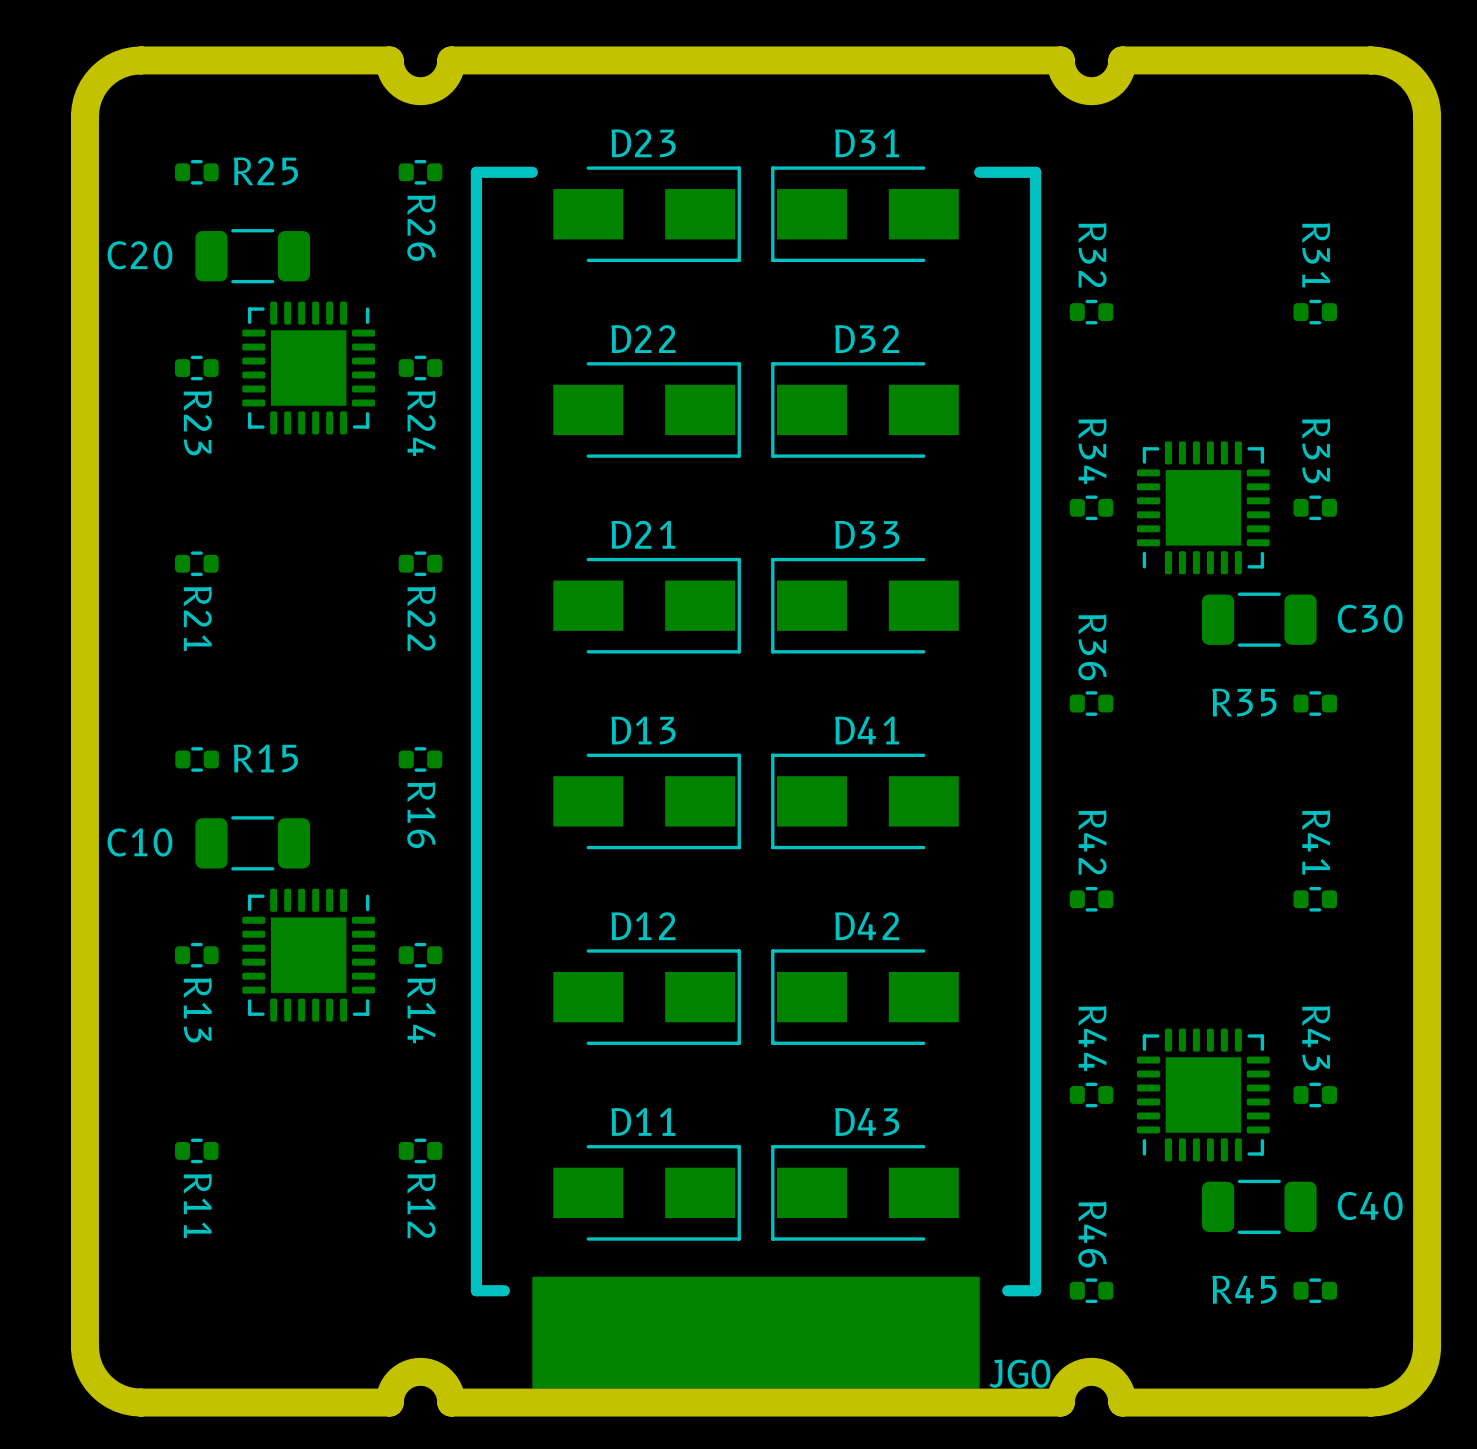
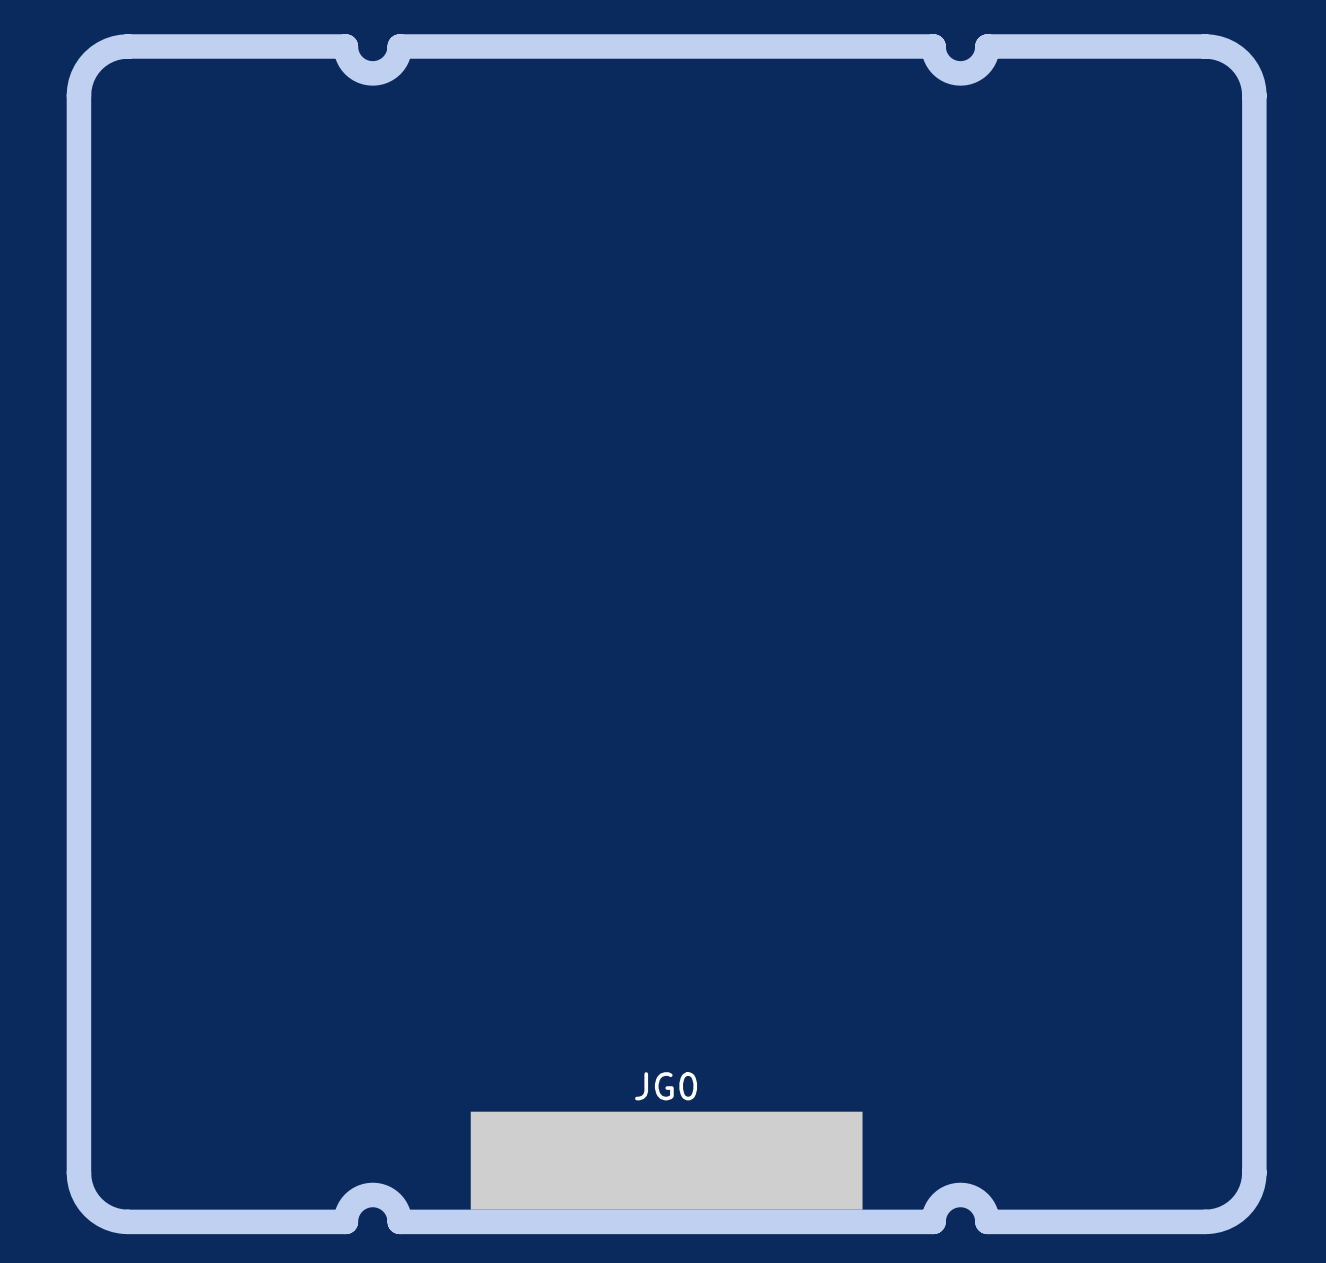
R25: (196, 172) -> none
R26: (420, 172) -> none
line: (532, 172) (476, 172) (476, 1290) (504, 1290) -> none
line: (979, 172) (1035, 172) (1035, 1290) (1007, 1290) -> none
D23: (647, 214) -> none
D31: (864, 214) -> none
C20: (252, 256) -> none
R32: (1091, 312) -> none
R31: (1315, 312) -> none
R23: (196, 368) -> none
part: (308, 368) -> none
R24: (420, 368) -> none
D22: (647, 409) -> none
D32: (864, 409) -> none
R34: (1091, 507) -> none
part: (1203, 507) -> none
R33: (1315, 507) -> none
R21: (196, 563) -> none
R22: (420, 563) -> none
D21: (647, 605) -> none
D33: (864, 605) -> none
C30: (1259, 619) -> none
R36: (1091, 703) -> none
R35: (1315, 703) -> none
R15: (197, 759) -> none
R16: (420, 759) -> none
D13: (647, 801) -> none
D41: (864, 801) -> none
C10: (252, 843) -> none
R42: (1091, 899) -> none
R41: (1315, 899) -> none
R13: (196, 955) -> none
part: (308, 955) -> none
R14: (420, 955) -> none
D12: (647, 997) -> none
D42: (864, 997) -> none
R44: (1091, 1095) -> none
part: (1203, 1095) -> none
R43: (1315, 1095) -> none
R11: (196, 1150) -> none
R12: (420, 1150) -> none
D11: (647, 1192) -> none
D43: (864, 1192) -> none
C40: (1259, 1206) -> none
R46: (1091, 1290) -> none
R45: (1315, 1290) -> none
JG0 name position: JG0 (1019, 1373) -> JG0 (666, 1086)

